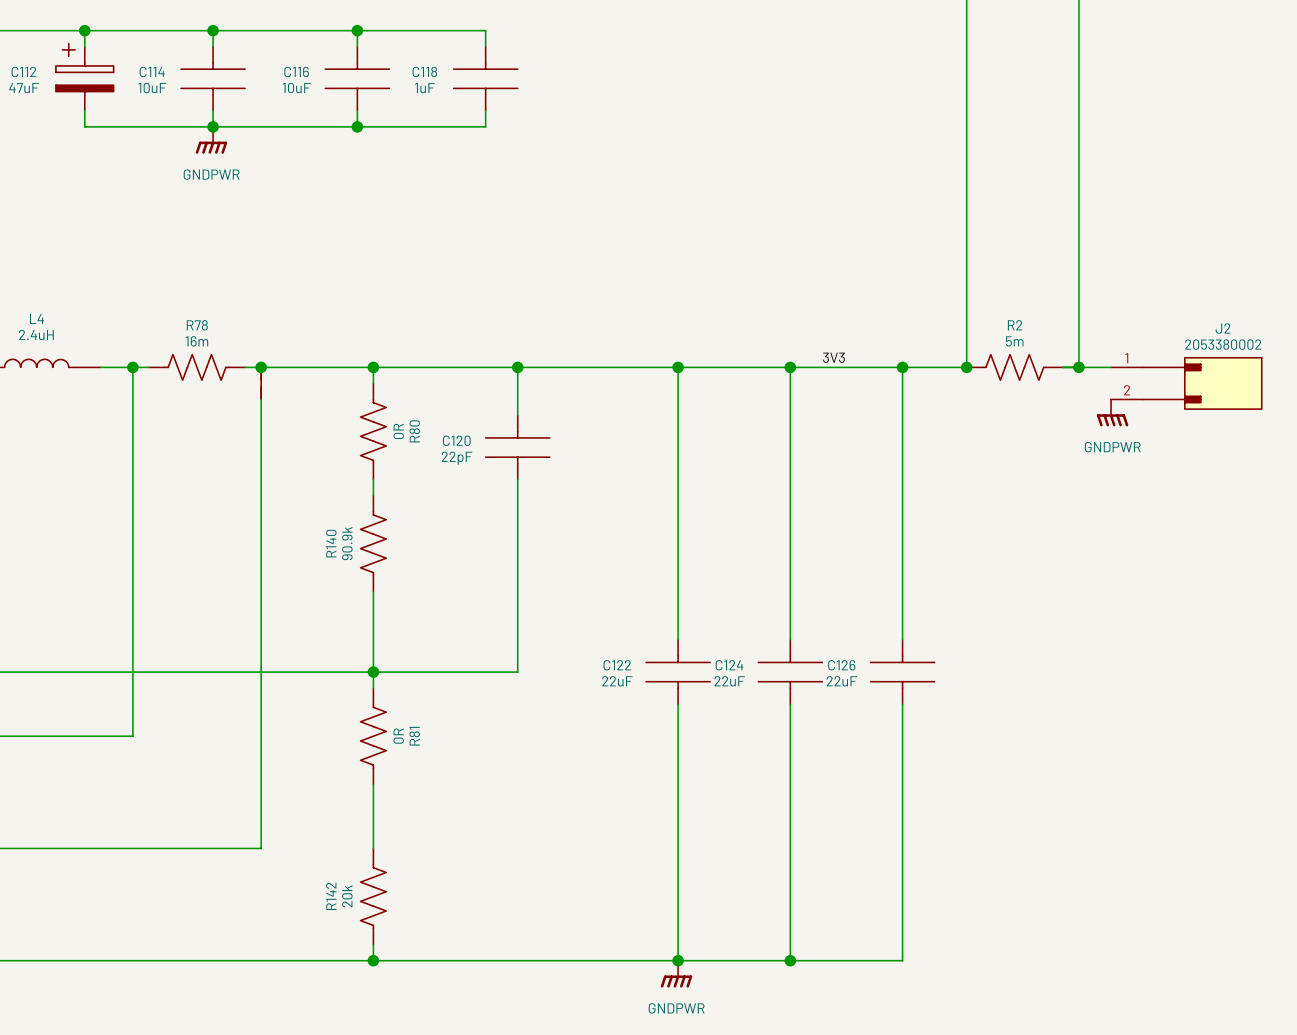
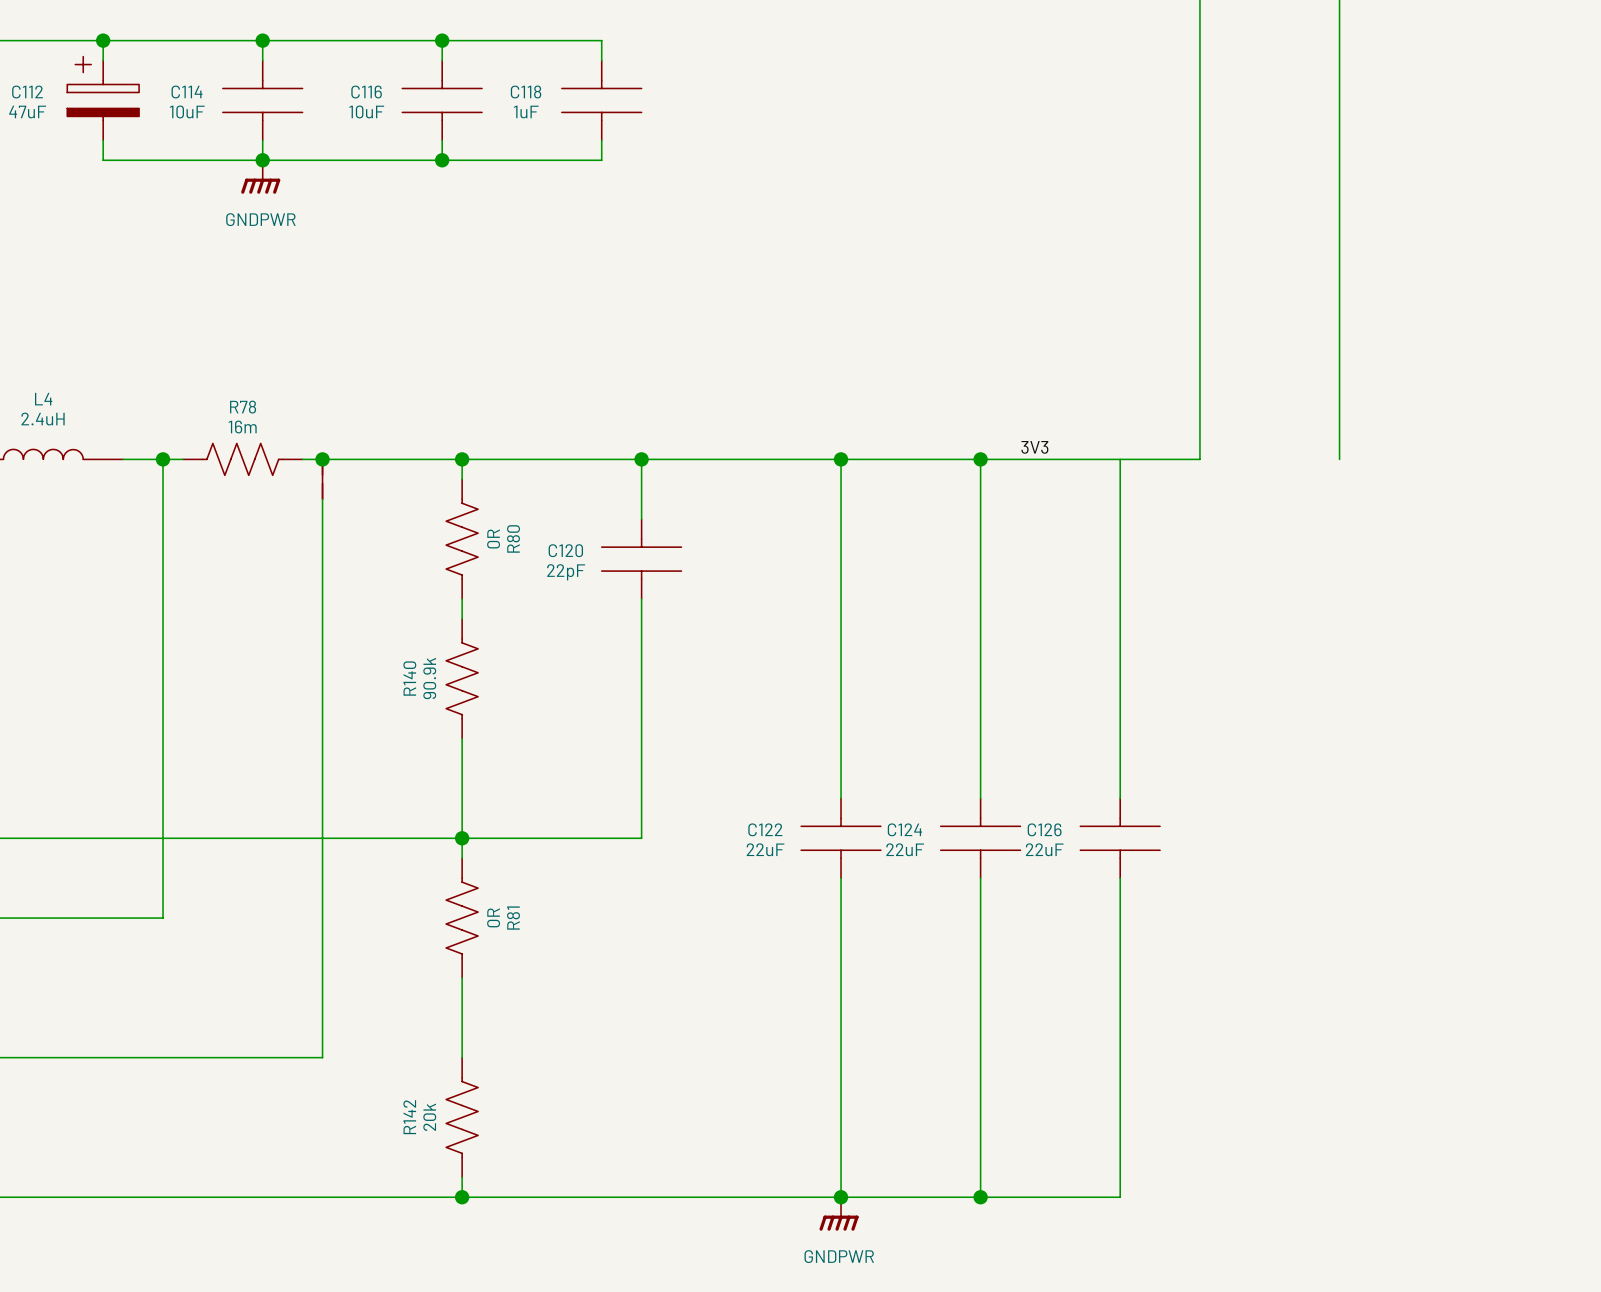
junction: (902, 367) -> none
junction: (966, 367) -> none
R2: 5m (1014, 367) -> none
wire: (1062, 367) (1111, 367) -> none
junction: (1078, 367) -> none
J2: 2053380002 (1186, 383) -> none
power symbol: GNDPWR (1112, 412) -> none

